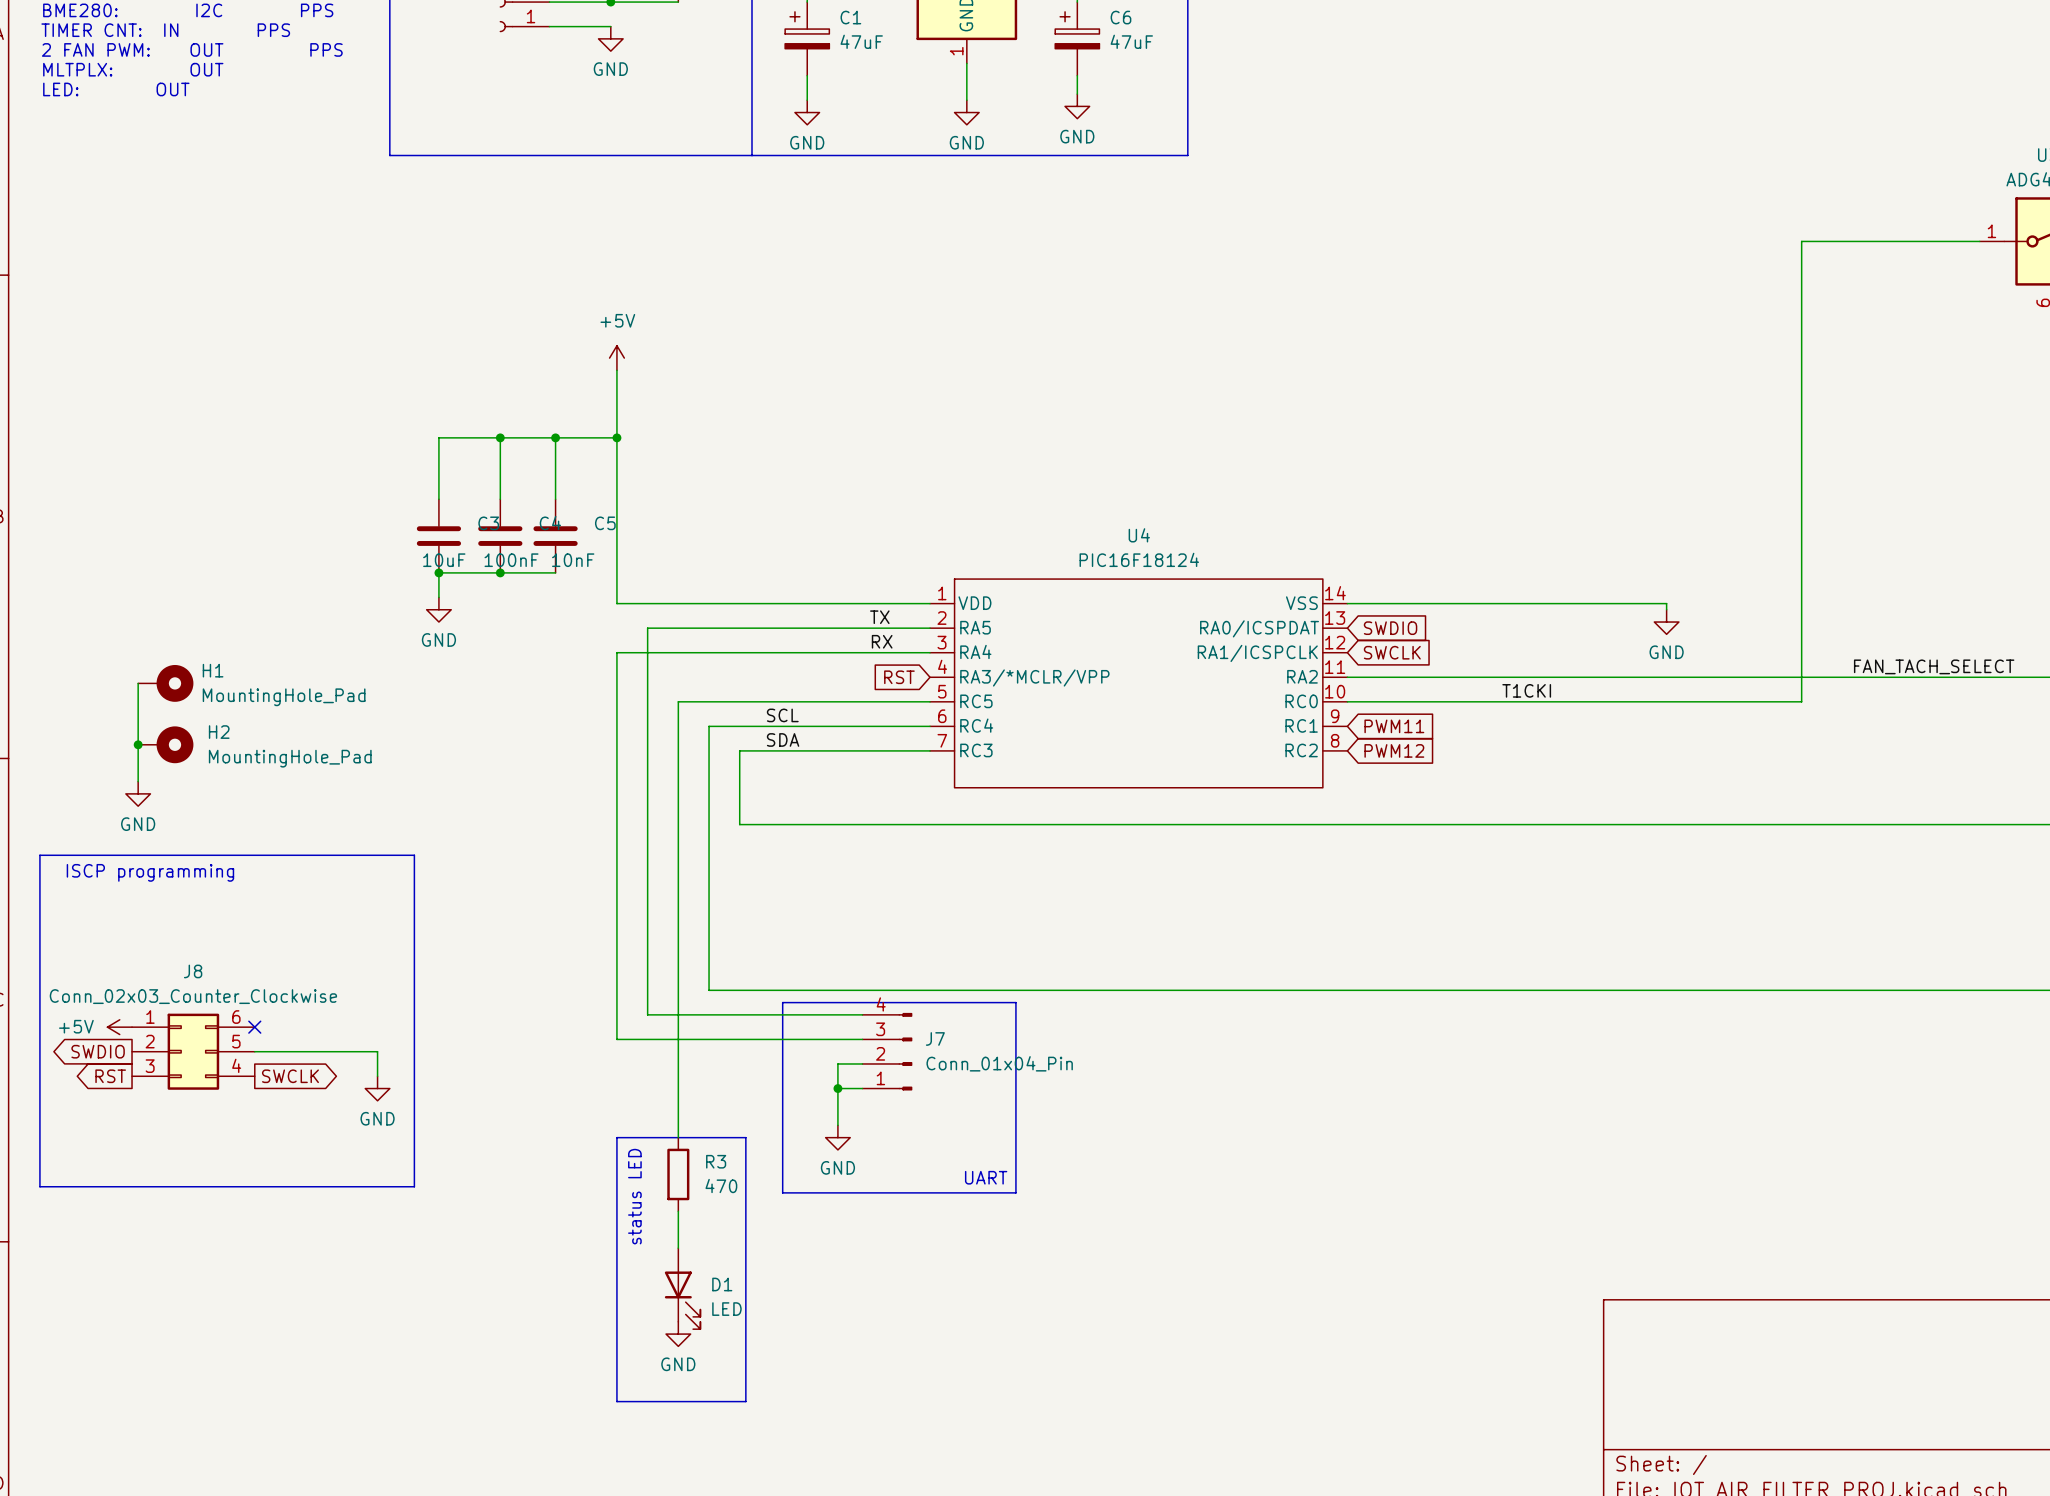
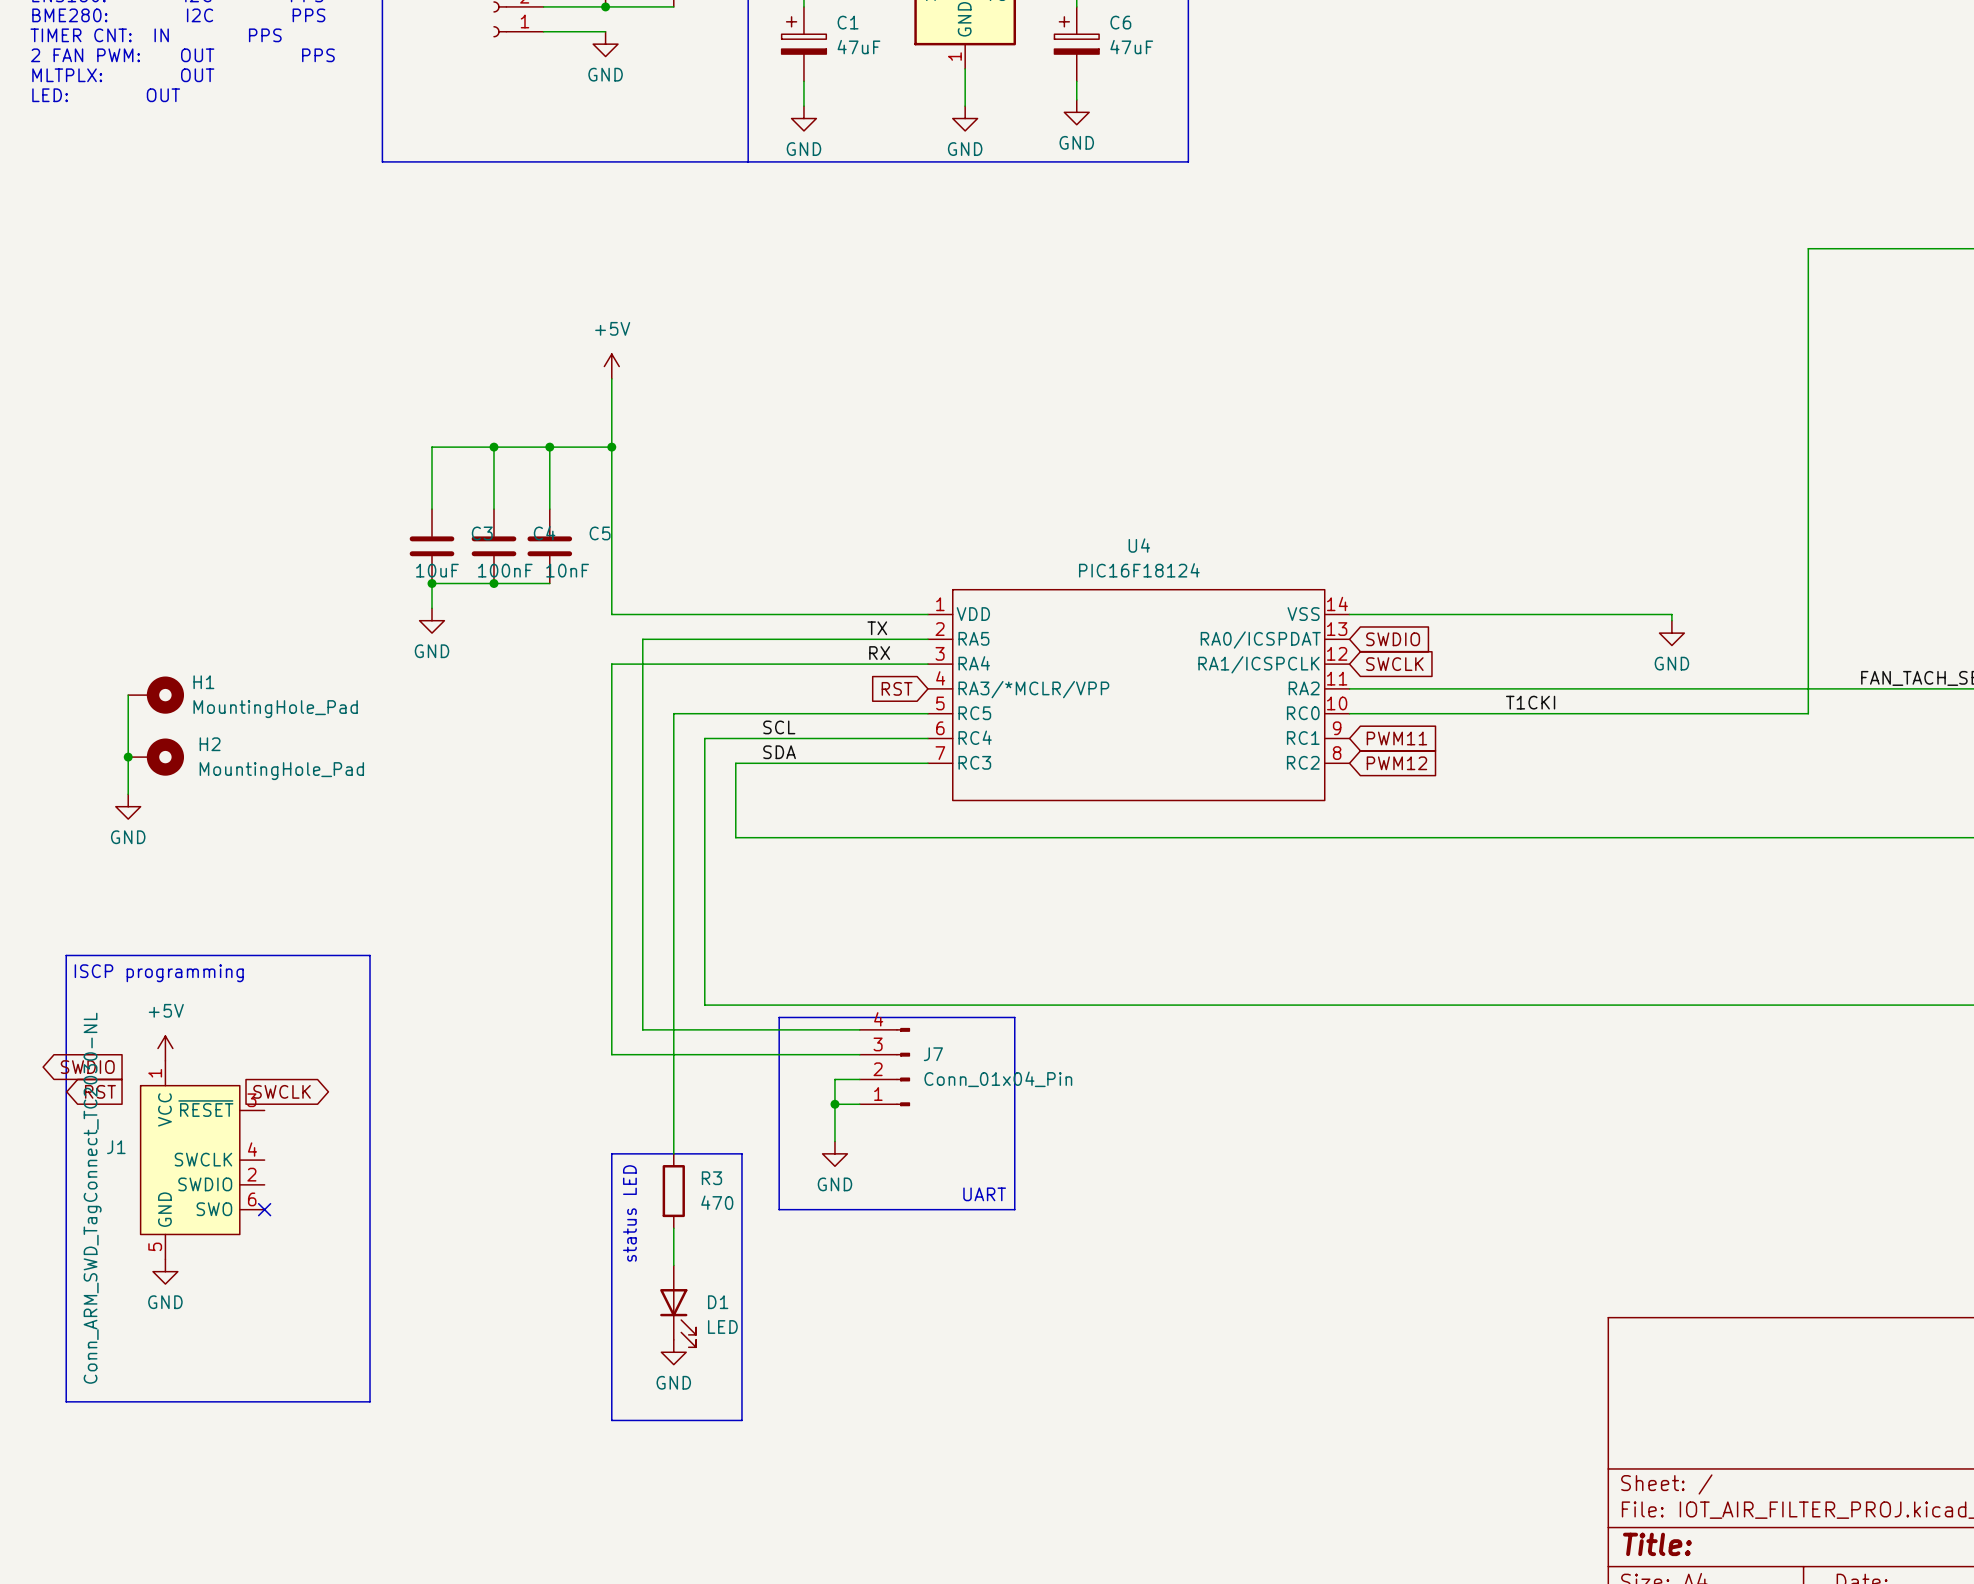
line: (39, 855) (414, 855) (414, 1186) (39, 1186) (39, 855) -> none
text position: ISCP programming (150, 872) -> ISCP programming (159, 973)
line: none -> (66, 955) (370, 955) (370, 1401) (66, 1401) (66, 955)
power symbol rotation: 0° (119, 1027) -> 90° clockwise (165, 1048)
power symbol position: +5V (119, 1027) -> +5V (165, 1048)
no-connect mark: (254, 1027) -> none
J8: Conn_02x03_Counter_Clockwise (193, 1051) -> none
wire: (254, 1051) (377, 1051) (377, 1076) -> none
power symbol: GND (377, 1088) -> none
J1: none -> Conn_ARM_SWD_TagConnect_TC2030-NL (202, 1160)
no-connect mark: none -> (264, 1209)
power symbol: none -> GND (165, 1271)

